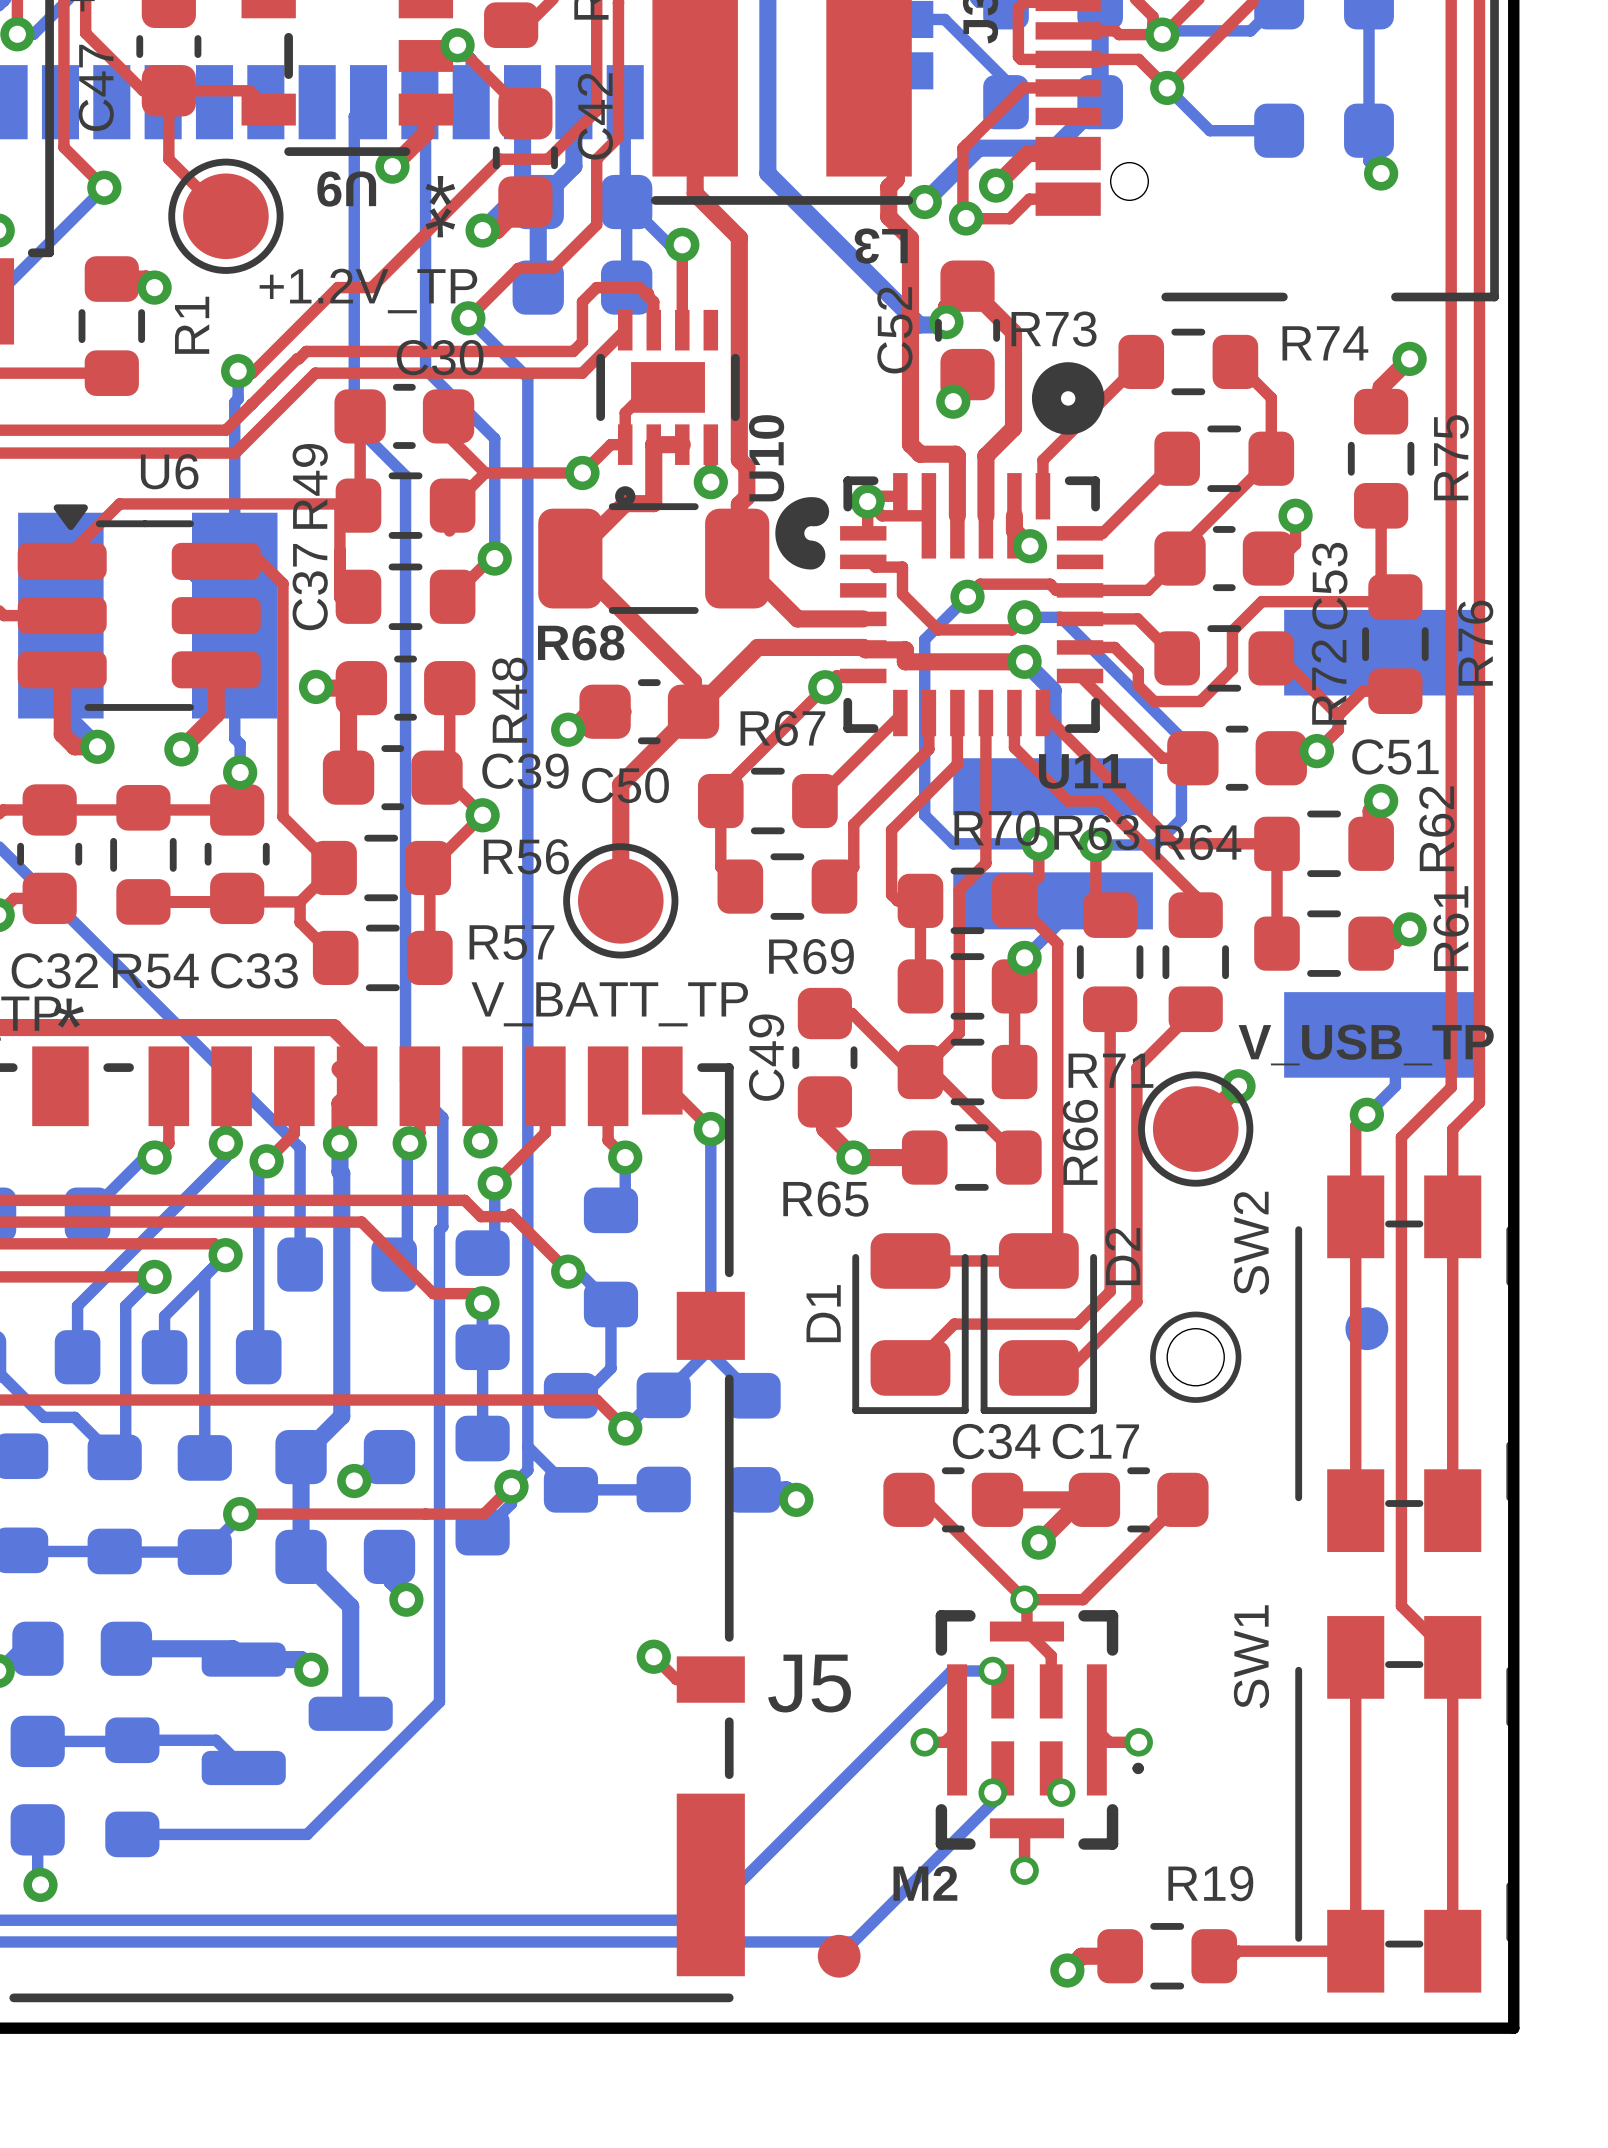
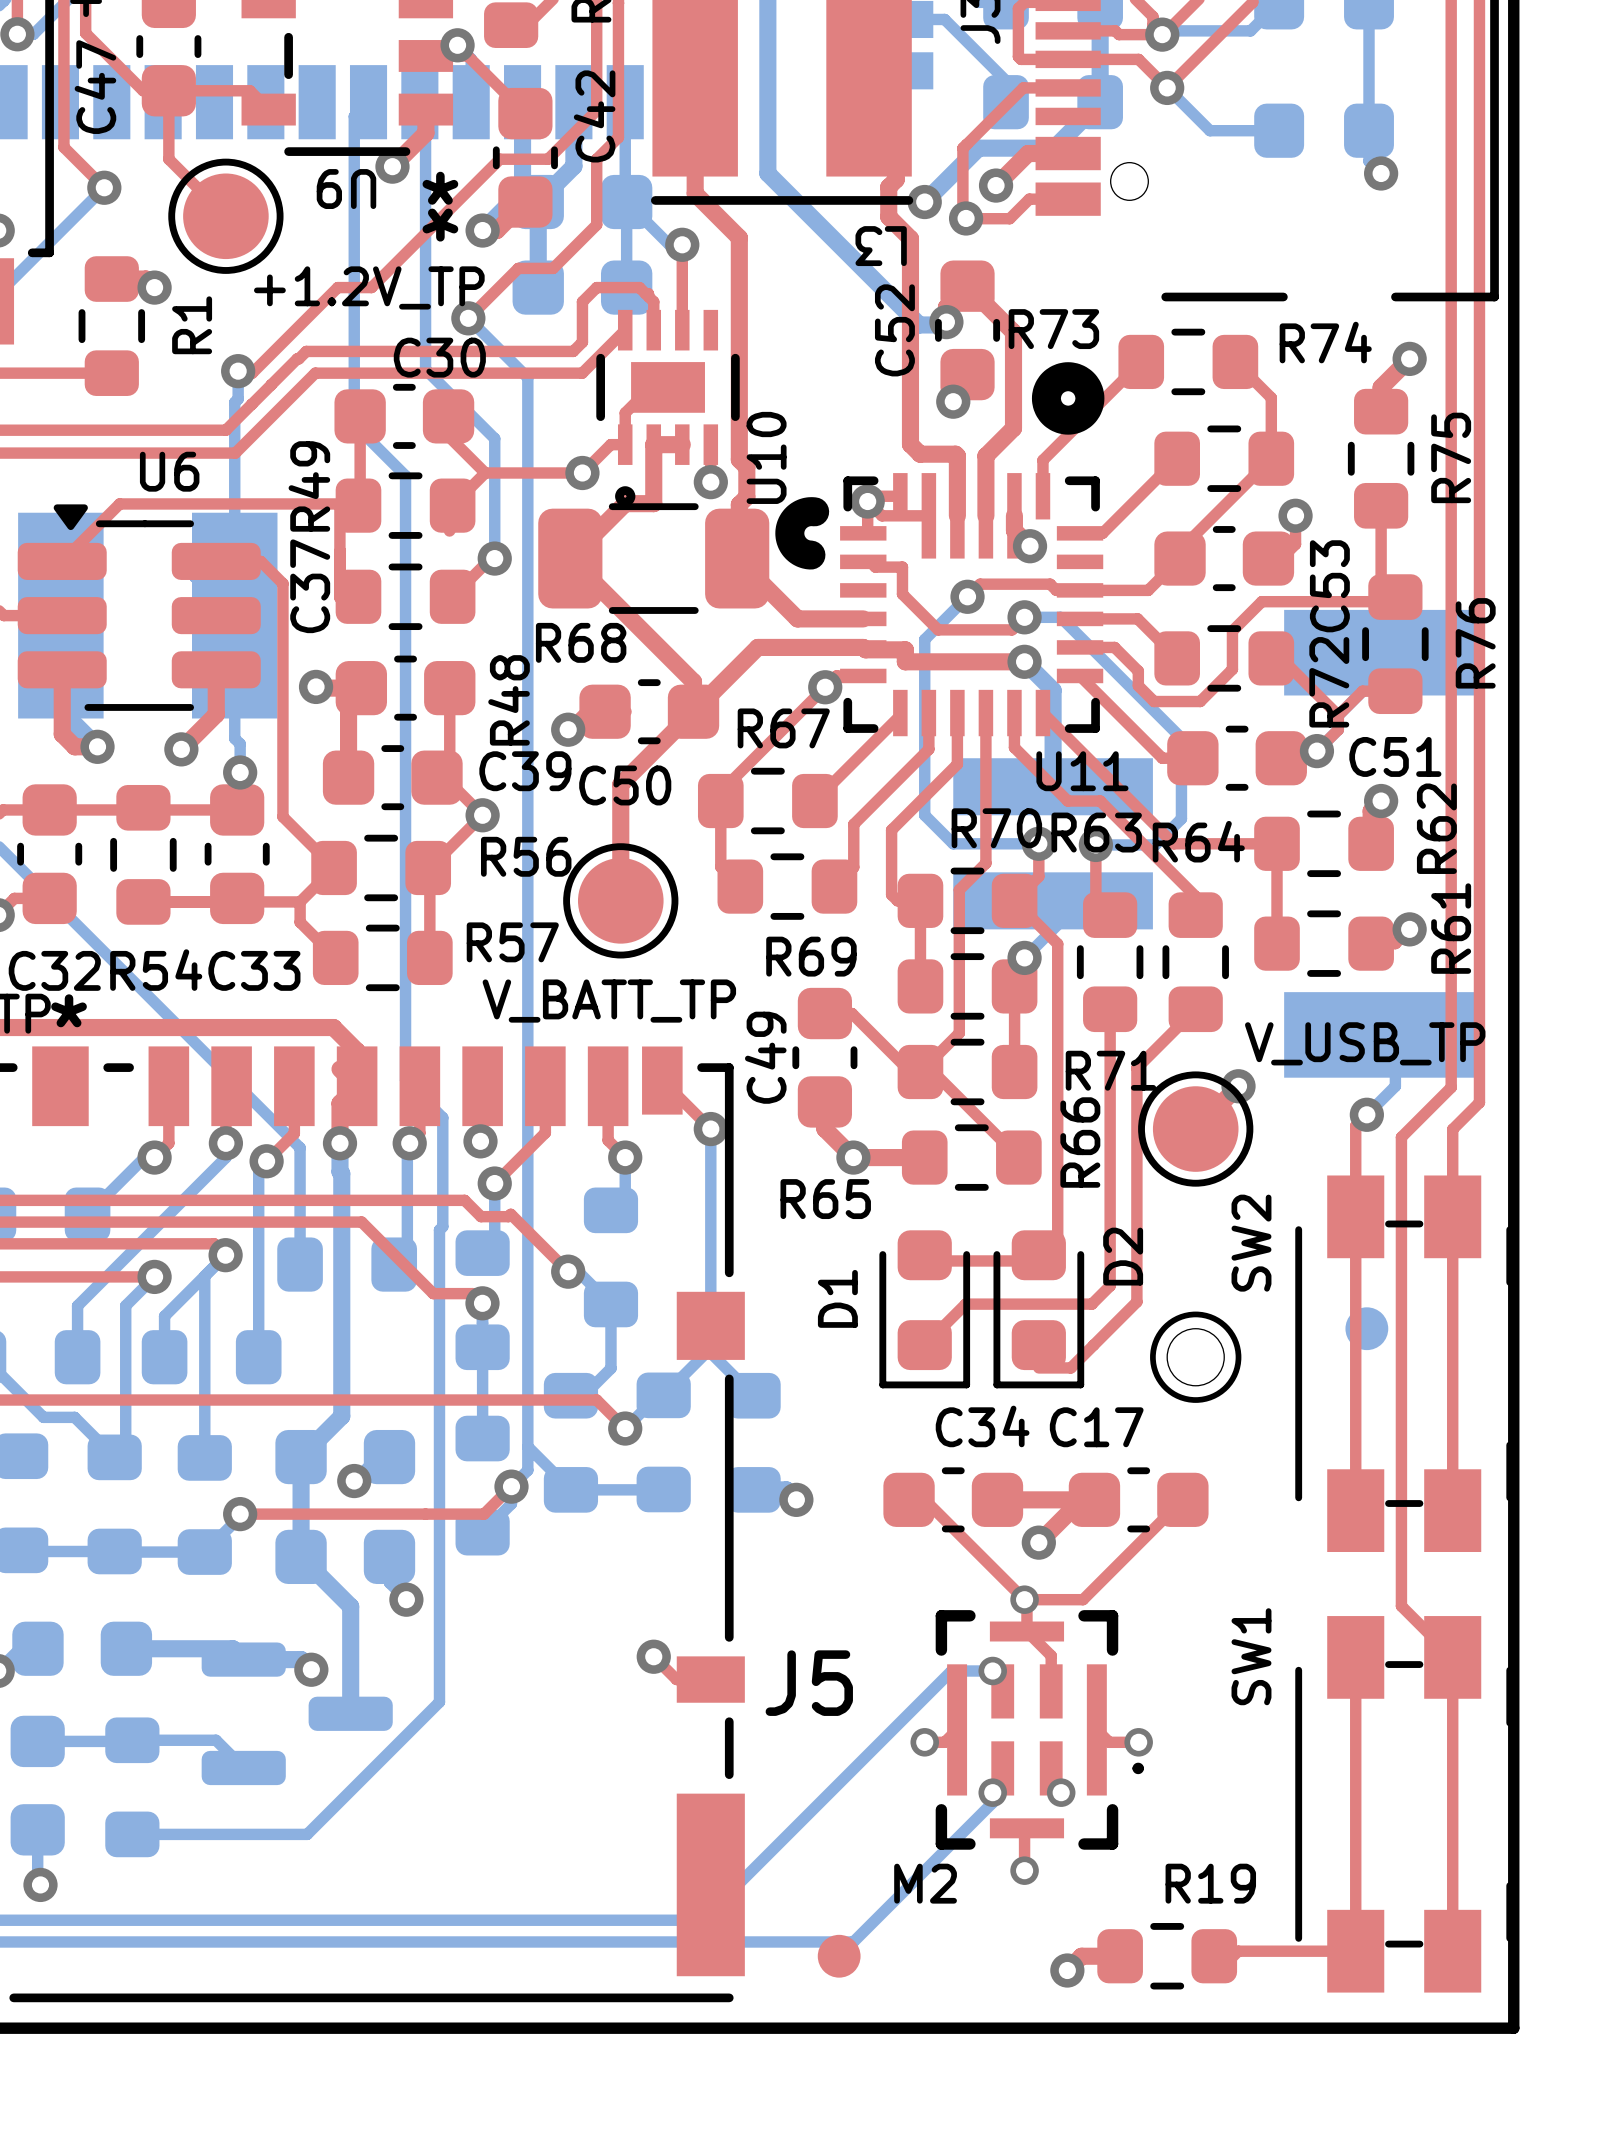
D1 footprint: [852, 1233, 969, 1415] -> [879, 1230, 971, 1389]
D2 footprint: [980, 1233, 1098, 1415] -> [993, 1230, 1085, 1389]
top track: (1110, 1285) (1110, 1291) (1077, 1324) (954, 1324) (910, 1367) -> (1110, 1285) (1091, 1304) (965, 1304) (924, 1345)
D1 name position: D1 (823, 1313) -> D1 (837, 1298)
C34 name position: C34 (996, 1441) -> C34 (982, 1426)
C17 name position: C17 (1095, 1441) -> C17 (1096, 1427)

